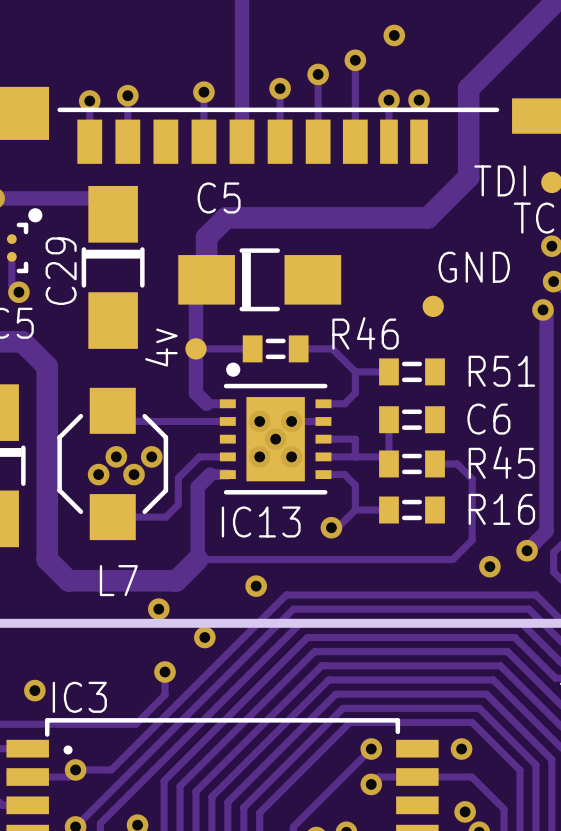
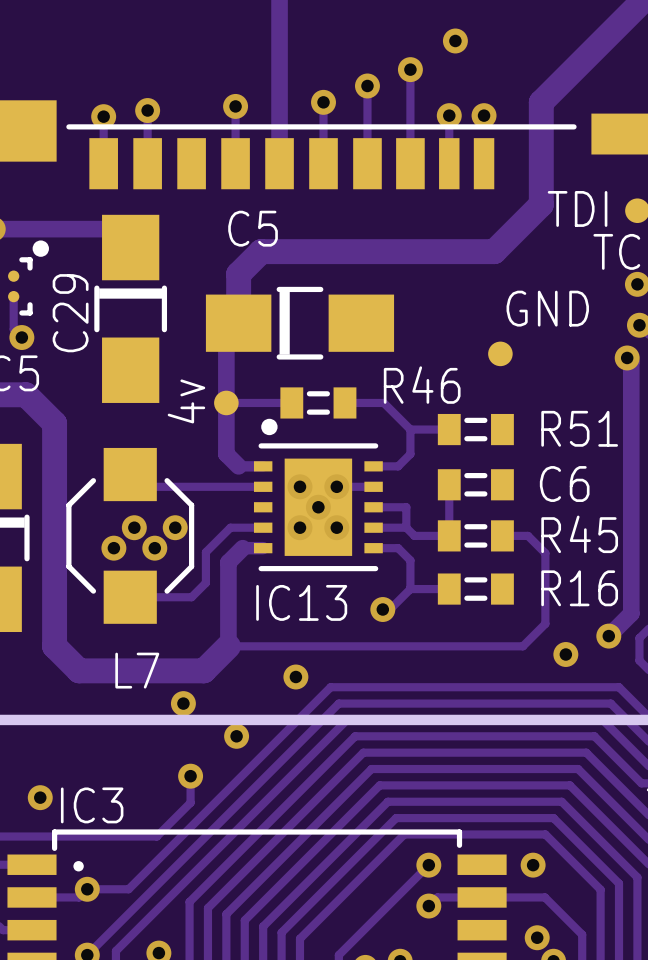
track: (351, 439) (355, 439) (355, 456) -> (406, 507) (406, 527) (414, 535) (449, 535)
track: (351, 456) (388, 456) -> none

